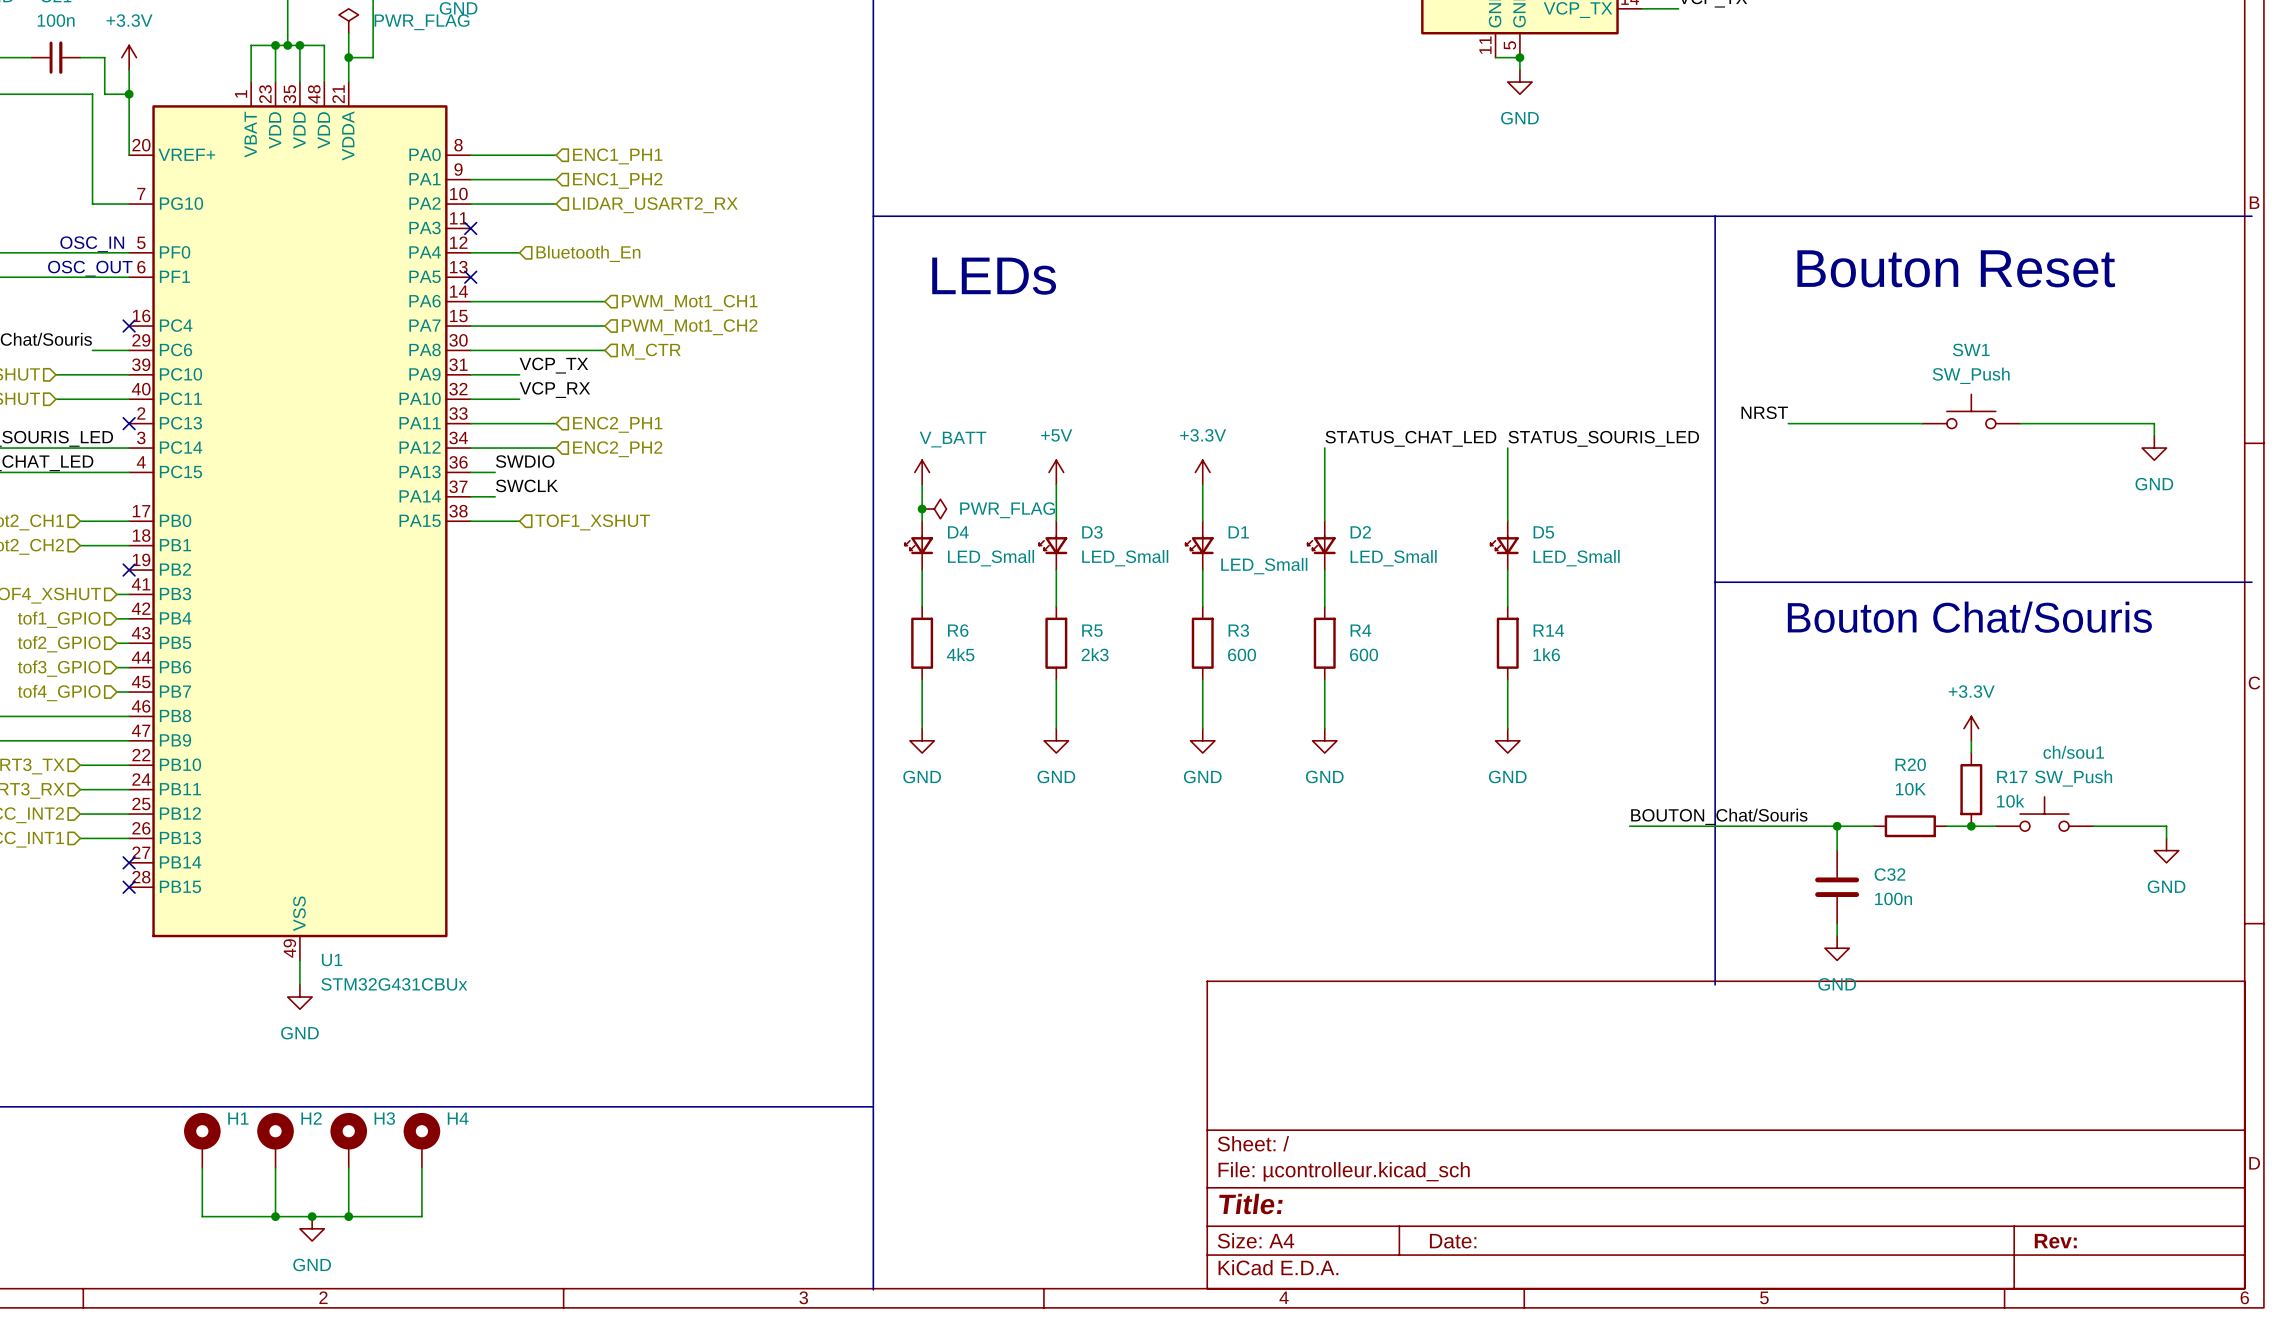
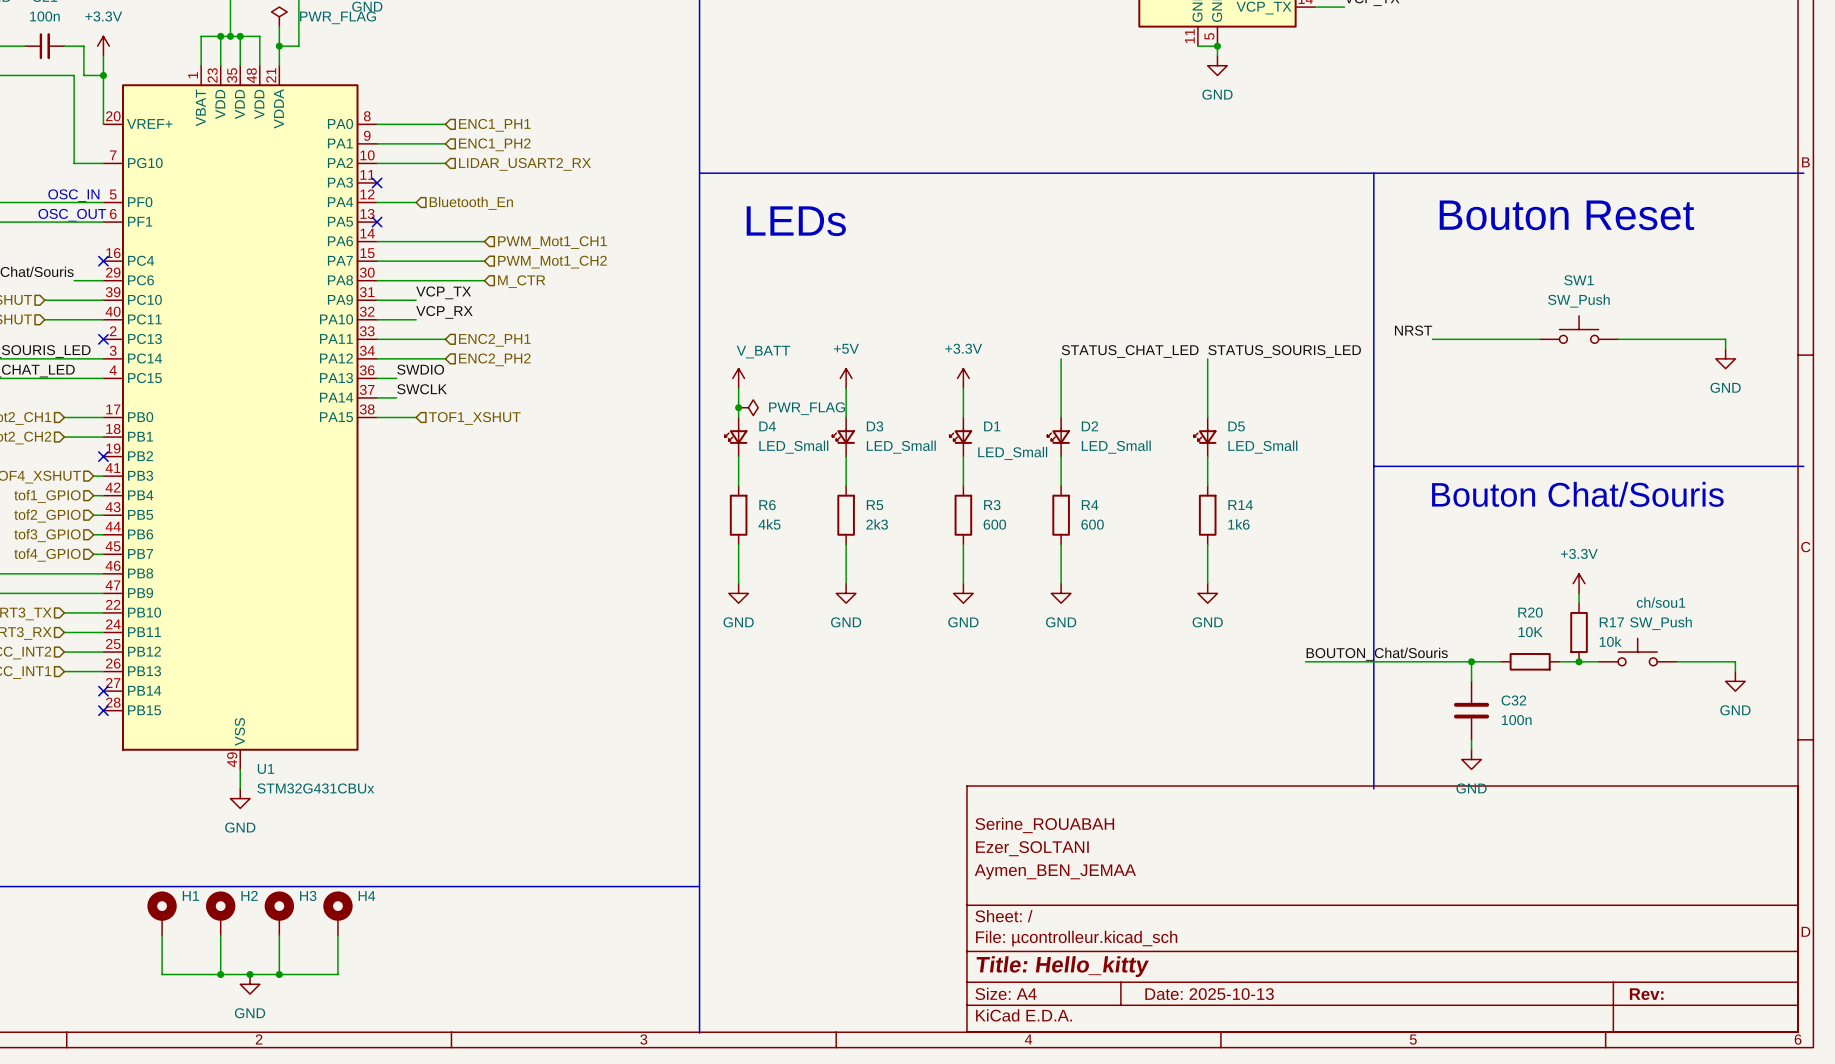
title block: none -> Serine_ROUABAH (1044, 825)
title block: none -> Ezer_SOLTANI (1032, 848)
title block: none -> Aymen_BEN_JEMAA (1055, 871)
title block: Title: (1250, 1204) -> Title: Hello_kitty (1062, 966)
title block: Date: (1453, 1241) -> Date: 2025-10-13 (1209, 994)

